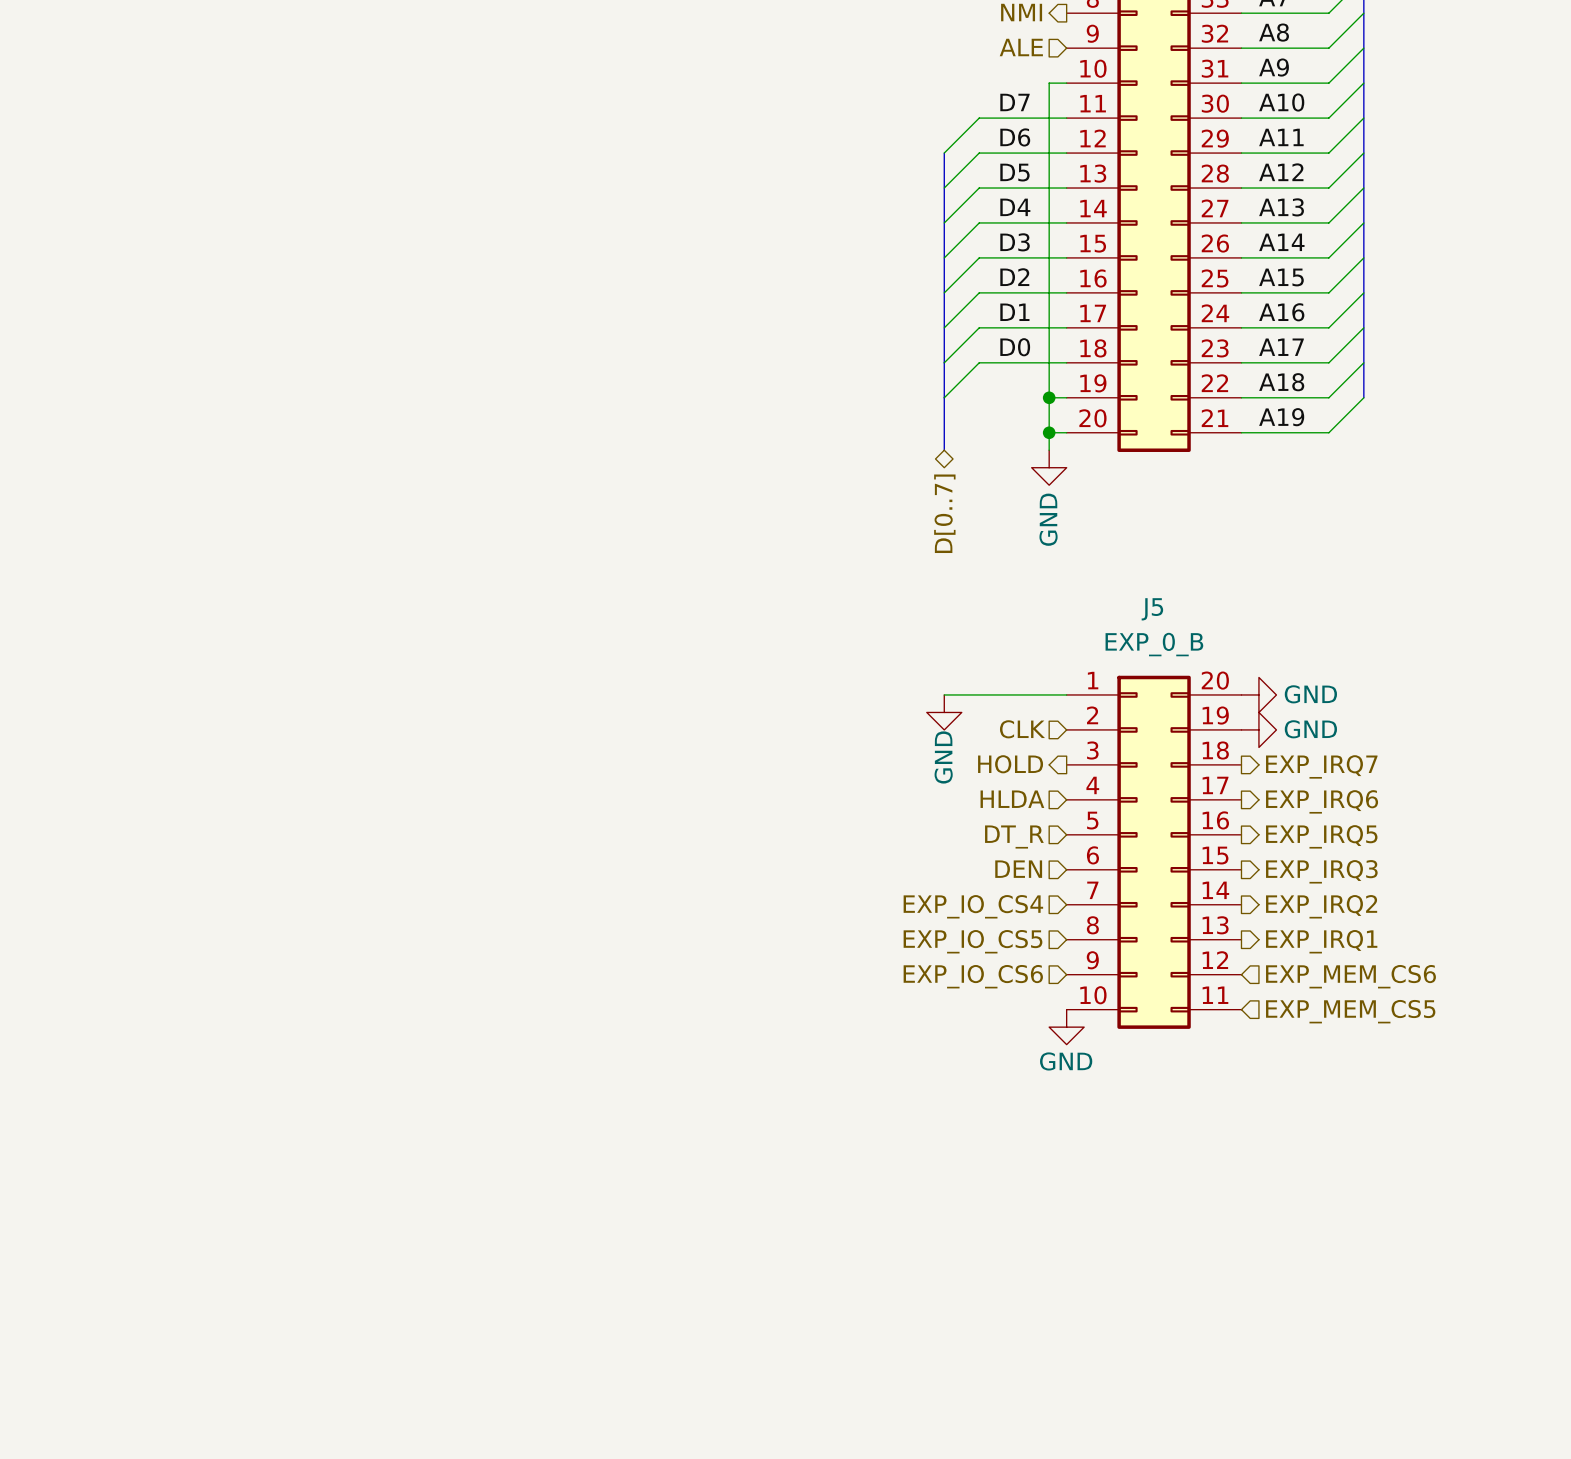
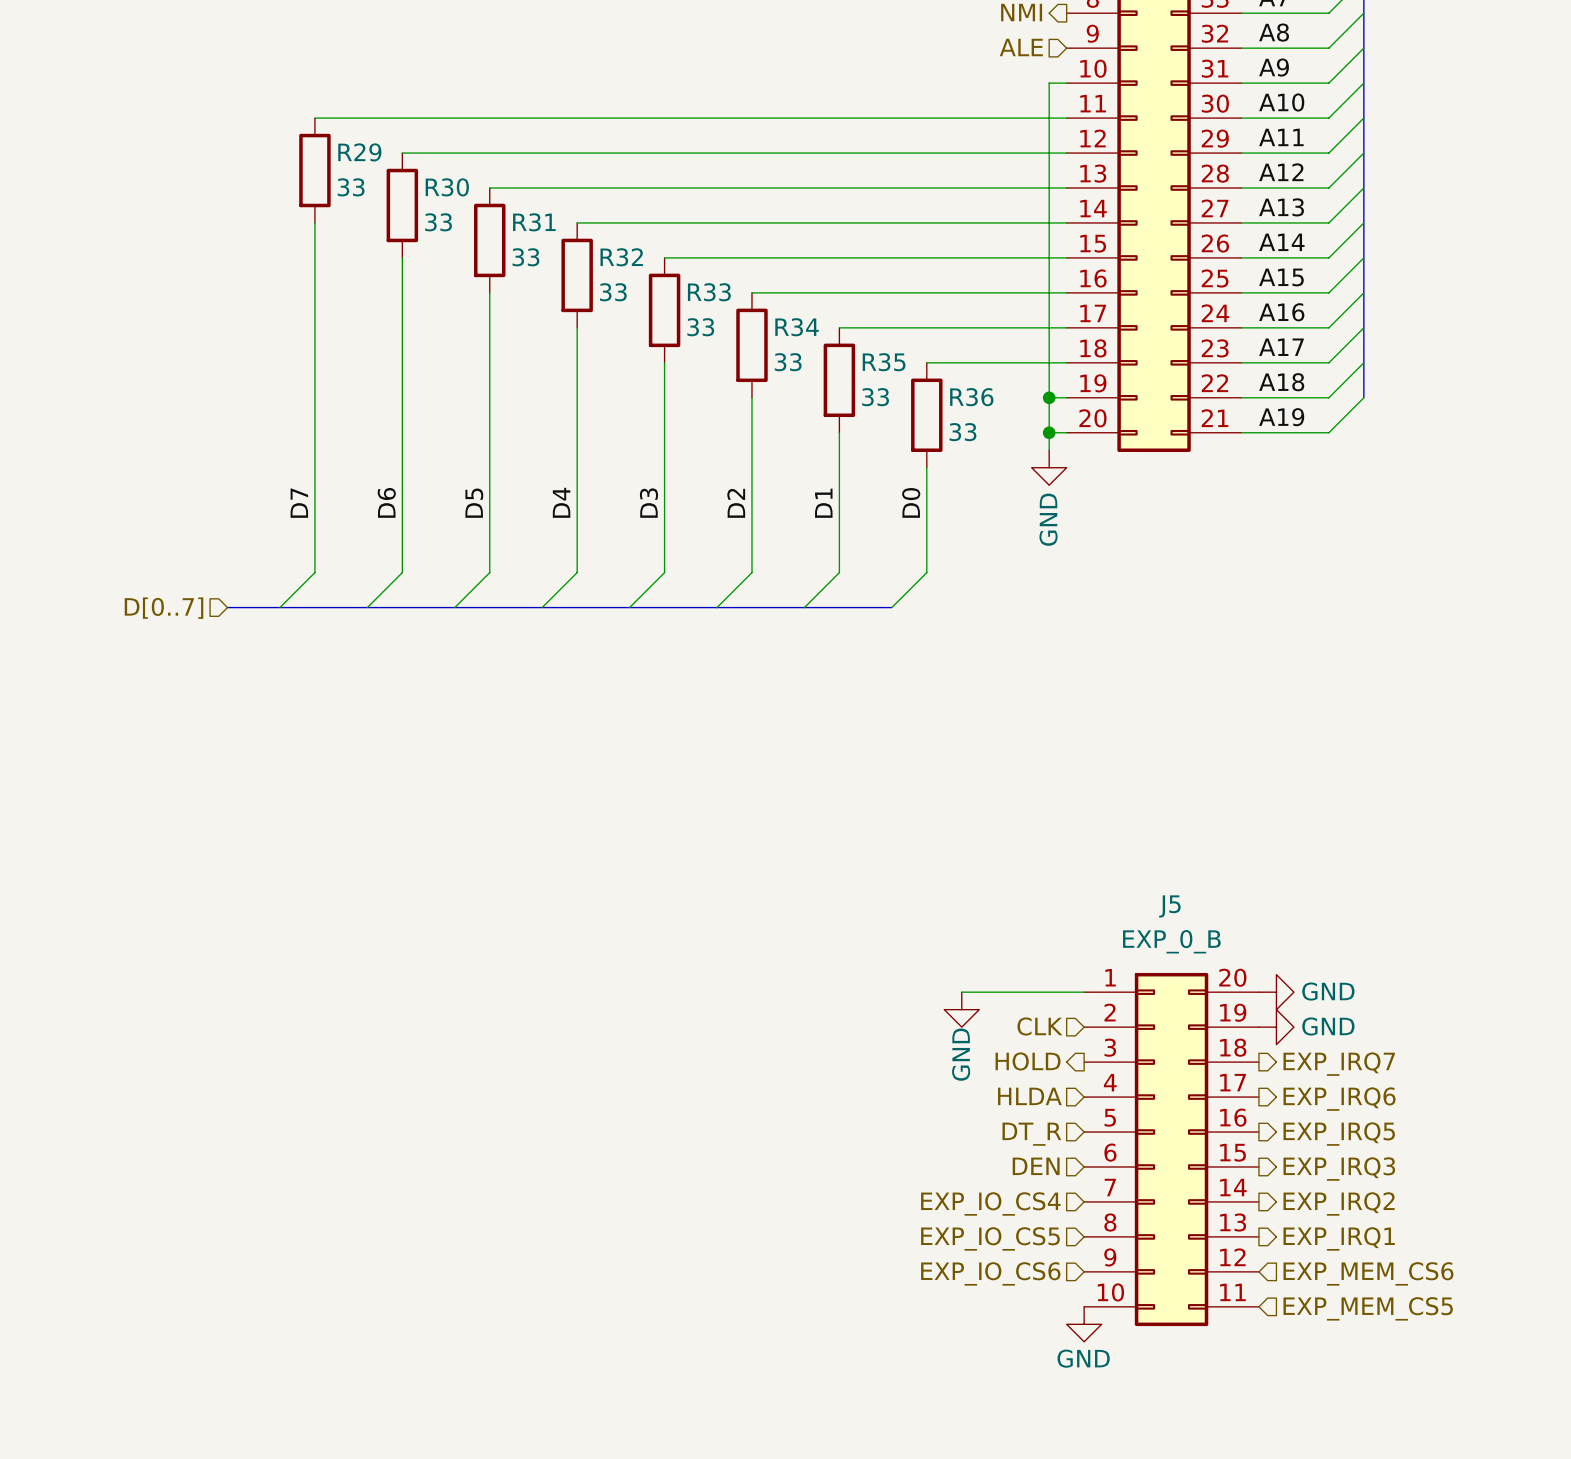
label: D7 (1014, 102) -> none
wire: (979, 118) (944, 153) -> (979, 118) (314, 118)
label: D6 (1015, 137) -> none
bus: (944, 153) (944, 450) -> none
wire: (979, 153) (944, 188) -> (979, 153) (402, 153)
R29: none -> 33 (314, 170)
label: D5 (1014, 172) -> none
wire: (979, 188) (944, 222) -> (979, 188) (489, 188)
R30: none -> 33 (402, 205)
label: D4 (1015, 207) -> none
wire: none -> (314, 222) (314, 572) (279, 607)
wire: (979, 222) (944, 257) -> (979, 222) (577, 222)
R31: none -> 33 (489, 240)
label: D3 (1015, 242) -> none
wire: none -> (402, 257) (402, 572) (367, 607)
wire: (979, 257) (944, 292) -> (979, 257) (664, 257)
R32: none -> 33 (577, 275)
label: D2 (1014, 277) -> none
wire: none -> (489, 292) (489, 572) (454, 607)
wire: (979, 292) (944, 327) -> (979, 292) (751, 292)
R33: none -> 33 (664, 310)
label rotation: 0° (1014, 312) -> 90° counterclockwise (823, 503)
label position: D1 (1014, 312) -> D1 (823, 503)
wire: none -> (577, 327) (577, 572) (542, 607)
wire: (979, 327) (944, 362) -> (979, 327) (839, 327)
R34: none -> 33 (751, 345)
label rotation: 0° (1015, 347) -> 90° counterclockwise (911, 502)
label position: D0 (1015, 347) -> D0 (911, 502)
wire: none -> (664, 362) (664, 572) (629, 607)
wire: (979, 362) (944, 397) -> (979, 362) (926, 362)
R35: none -> 33 (839, 380)
wire: none -> (751, 397) (751, 572) (717, 607)
R36: none -> 33 (926, 415)
wire: none -> (839, 432) (839, 572) (804, 607)
wire: none -> (926, 467) (926, 572) (891, 607)
label: none -> D6 (386, 502)
label: none -> D4 (561, 502)
label: none -> D7 (299, 503)
label: none -> D5 (474, 503)
label: none -> D3 (648, 503)
label: none -> D2 (736, 503)
hierarchical label: D[0..7] (944, 513) -> none
bus: none -> (227, 607) (891, 607)
hierarchical label: none -> D[0..7] (164, 608)
wire: (944, 694) (1066, 694) -> (961, 992) (1084, 992)
power symbol: GND (1258, 694) -> none
power symbol: GND (944, 712) -> none
hierarchical label position: CLK (1022, 729) -> CLK (1039, 1026)
power symbol: GND (1258, 729) -> none
hierarchical label position: HOLD (1010, 764) -> HOLD (1028, 1061)
hierarchical label position: EXP_IRQ7 (1321, 766) -> EXP_IRQ7 (1339, 1064)
hierarchical label position: HLDA (1012, 799) -> HLDA (1029, 1096)
hierarchical label position: EXP_IRQ6 (1322, 801) -> EXP_IRQ6 (1339, 1099)
hierarchical label position: EXP_IRQ5 (1321, 836) -> EXP_IRQ5 (1339, 1134)
hierarchical label position: DT_R (1014, 837) -> DT_R (1031, 1134)
J5 position: (1154, 852) -> (1171, 1149)
hierarchical label position: DEN (1018, 869) -> DEN (1036, 1166)
hierarchical label position: EXP_IRQ3 (1321, 871) -> EXP_IRQ3 (1339, 1169)
hierarchical label position: EXP_IO_CS4 (973, 906) -> EXP_IO_CS4 (990, 1203)
hierarchical label position: EXP_IRQ2 (1321, 906) -> EXP_IRQ2 (1339, 1203)
hierarchical label position: EXP_IO_CS5 (972, 941) -> EXP_IO_CS5 (990, 1238)
hierarchical label position: EXP_IRQ1 (1321, 941) -> EXP_IRQ1 (1339, 1238)
hierarchical label position: EXP_IO_CS6 (973, 976) -> EXP_IO_CS6 (990, 1273)
hierarchical label position: EXP_MEM_CS6 (1350, 976) -> EXP_MEM_CS6 (1368, 1273)
power symbol: none -> GND (1276, 992)
power symbol: none -> GND (961, 1009)
hierarchical label position: EXP_MEM_CS5 (1350, 1011) -> EXP_MEM_CS5 (1368, 1308)
power symbol: GND (1066, 1027) -> none
power symbol: none -> GND (1276, 1027)
power symbol: none -> GND (1084, 1324)

